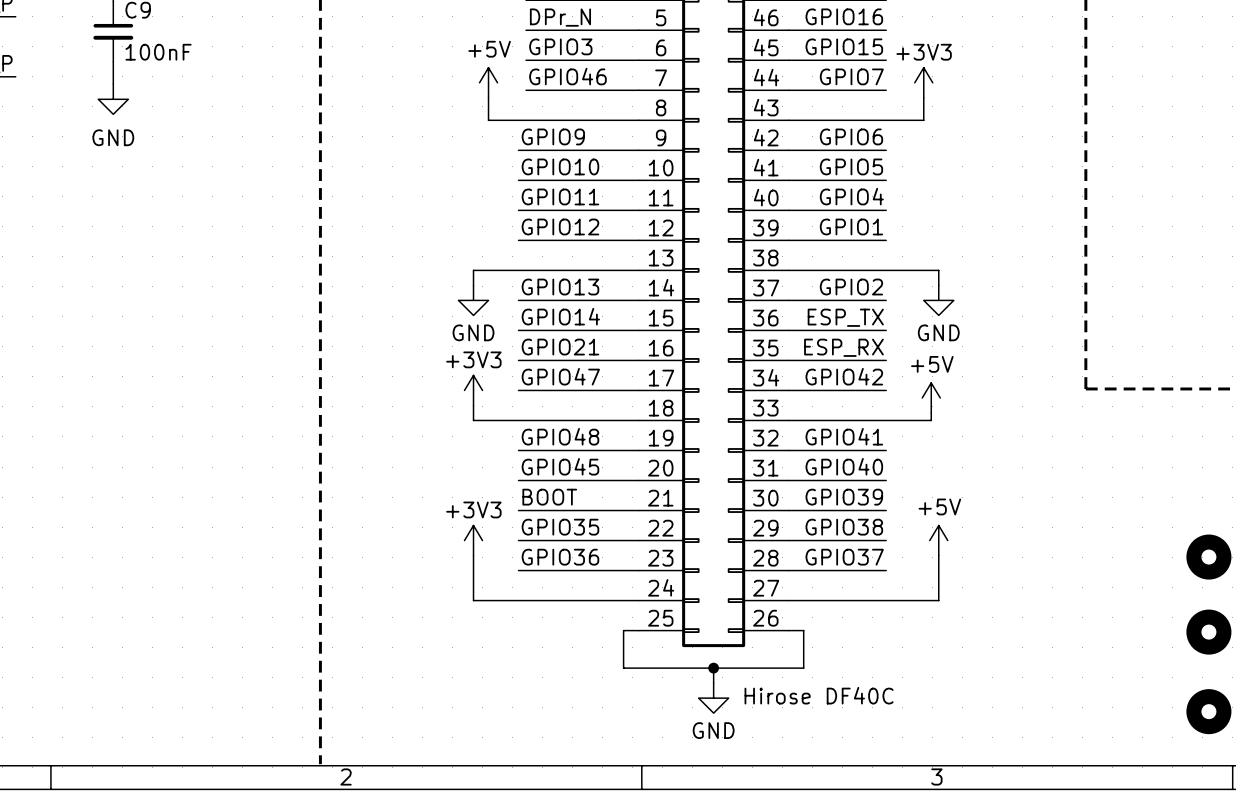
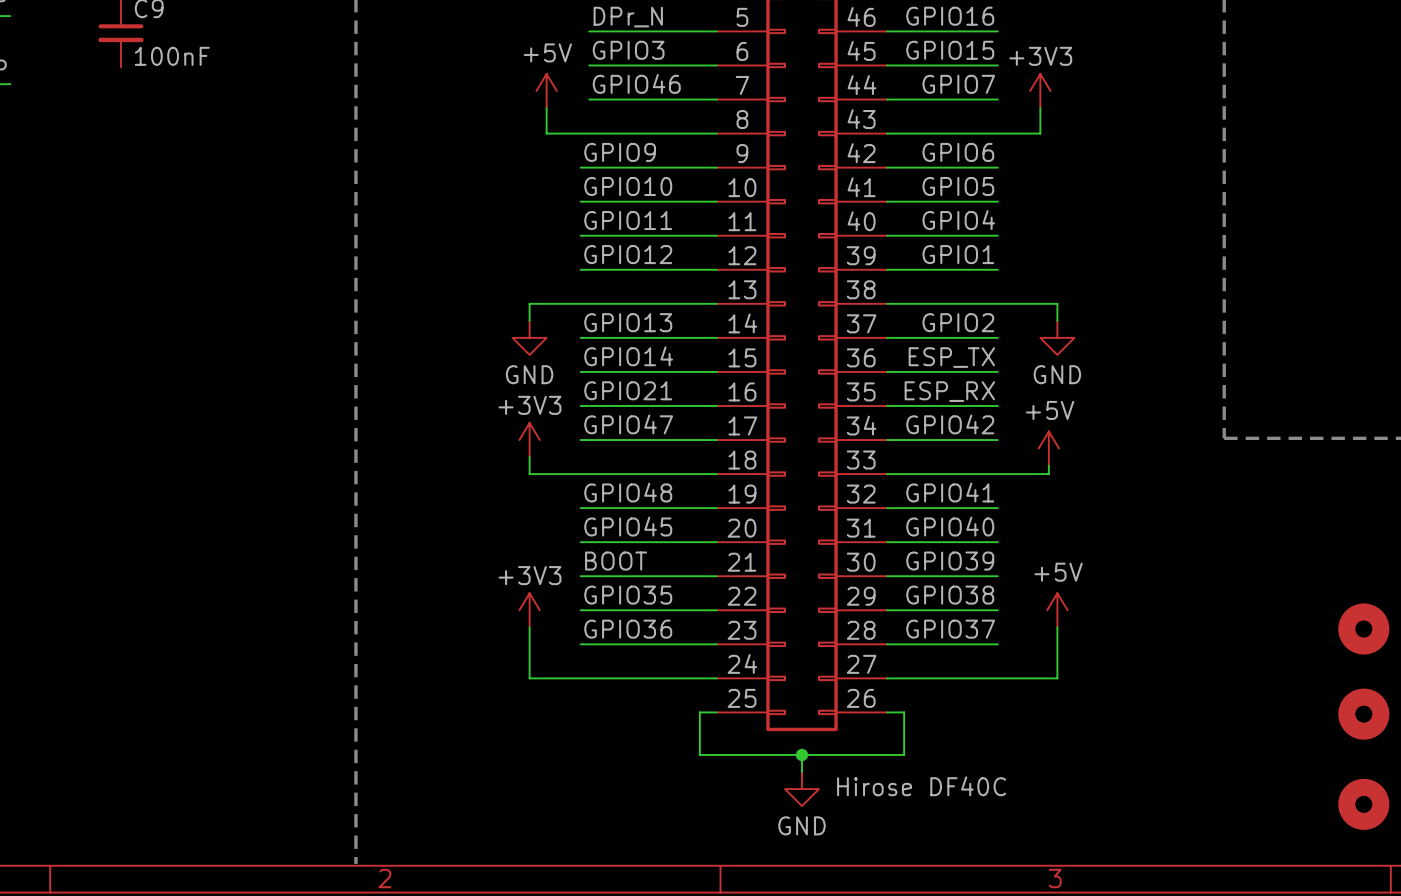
wire: (113, 61) (113, 84) -> none
power symbol: GND (113, 99) -> none

